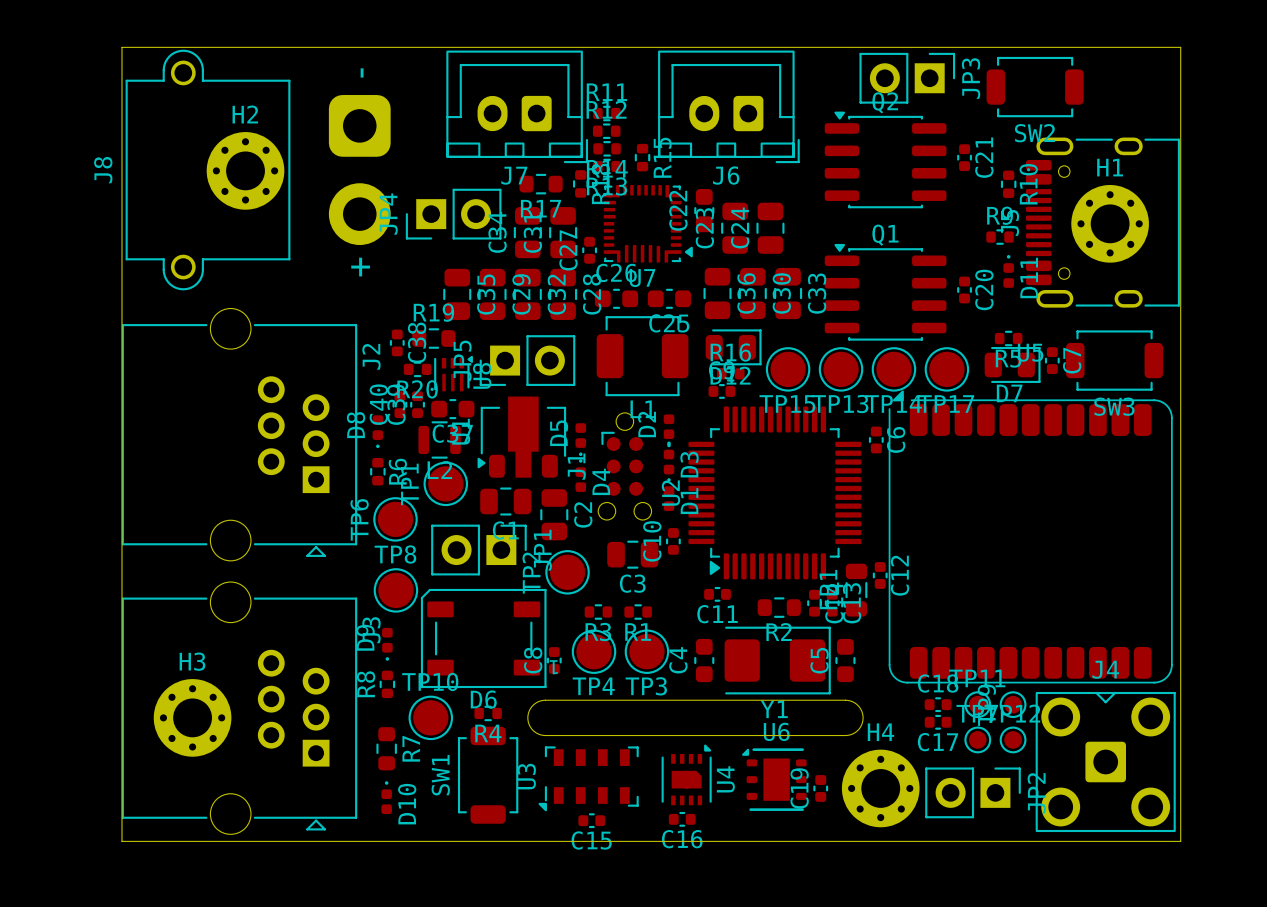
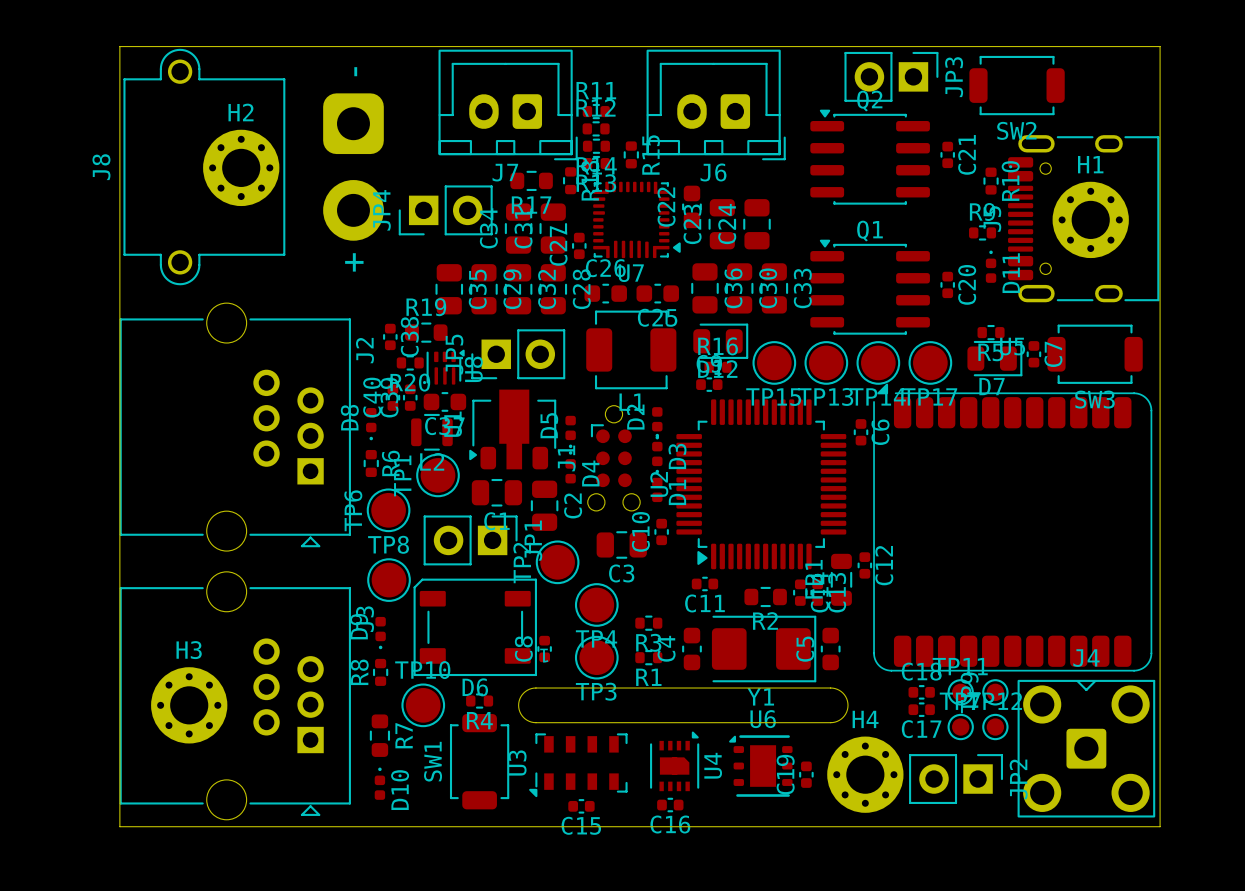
R3 position: (598, 612) -> (648, 623)
R1 position: (638, 612) -> (648, 657)
TP4 position: (594, 651) -> (596, 604)
TP3 position: (646, 651) -> (596, 657)

